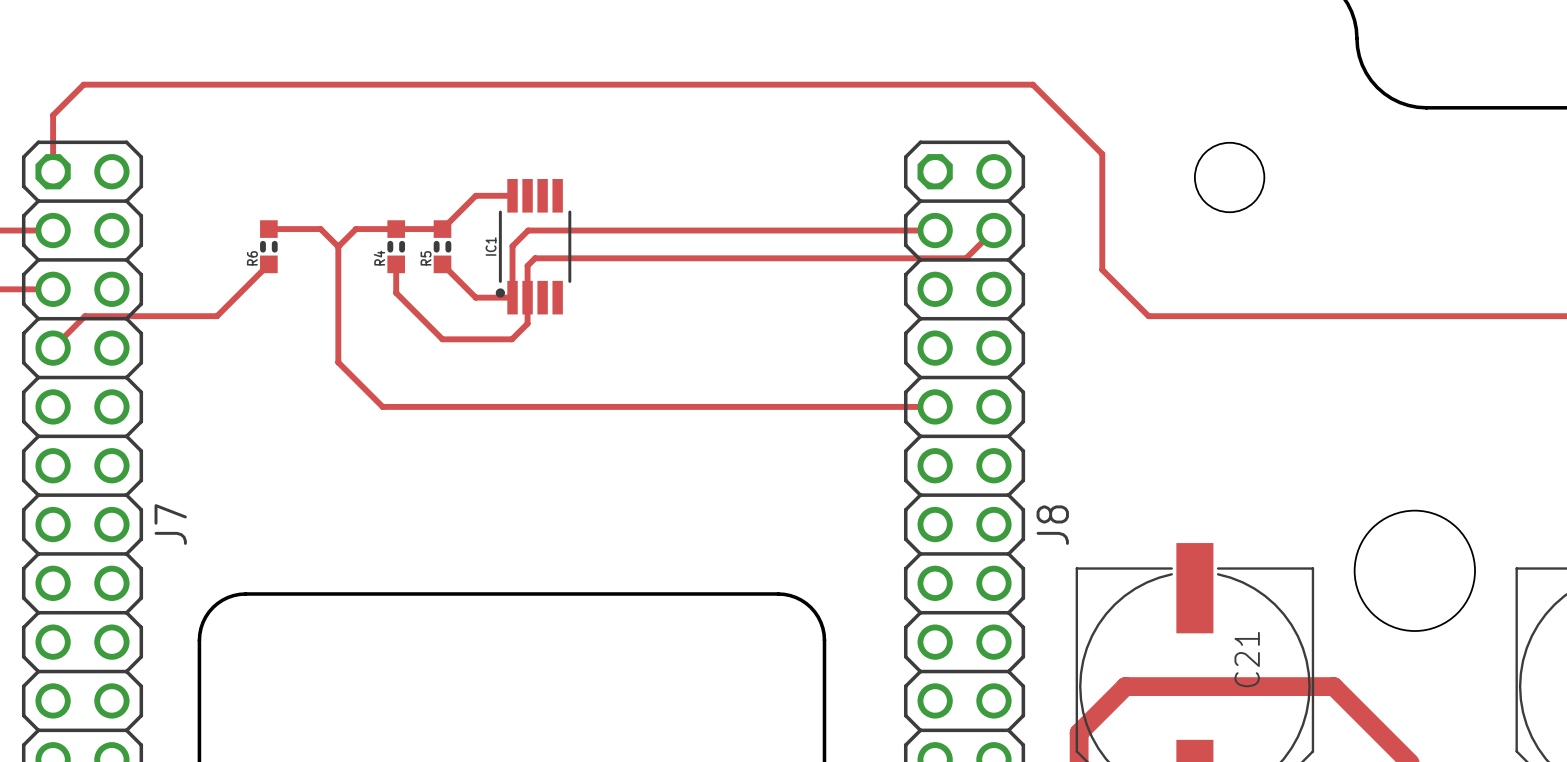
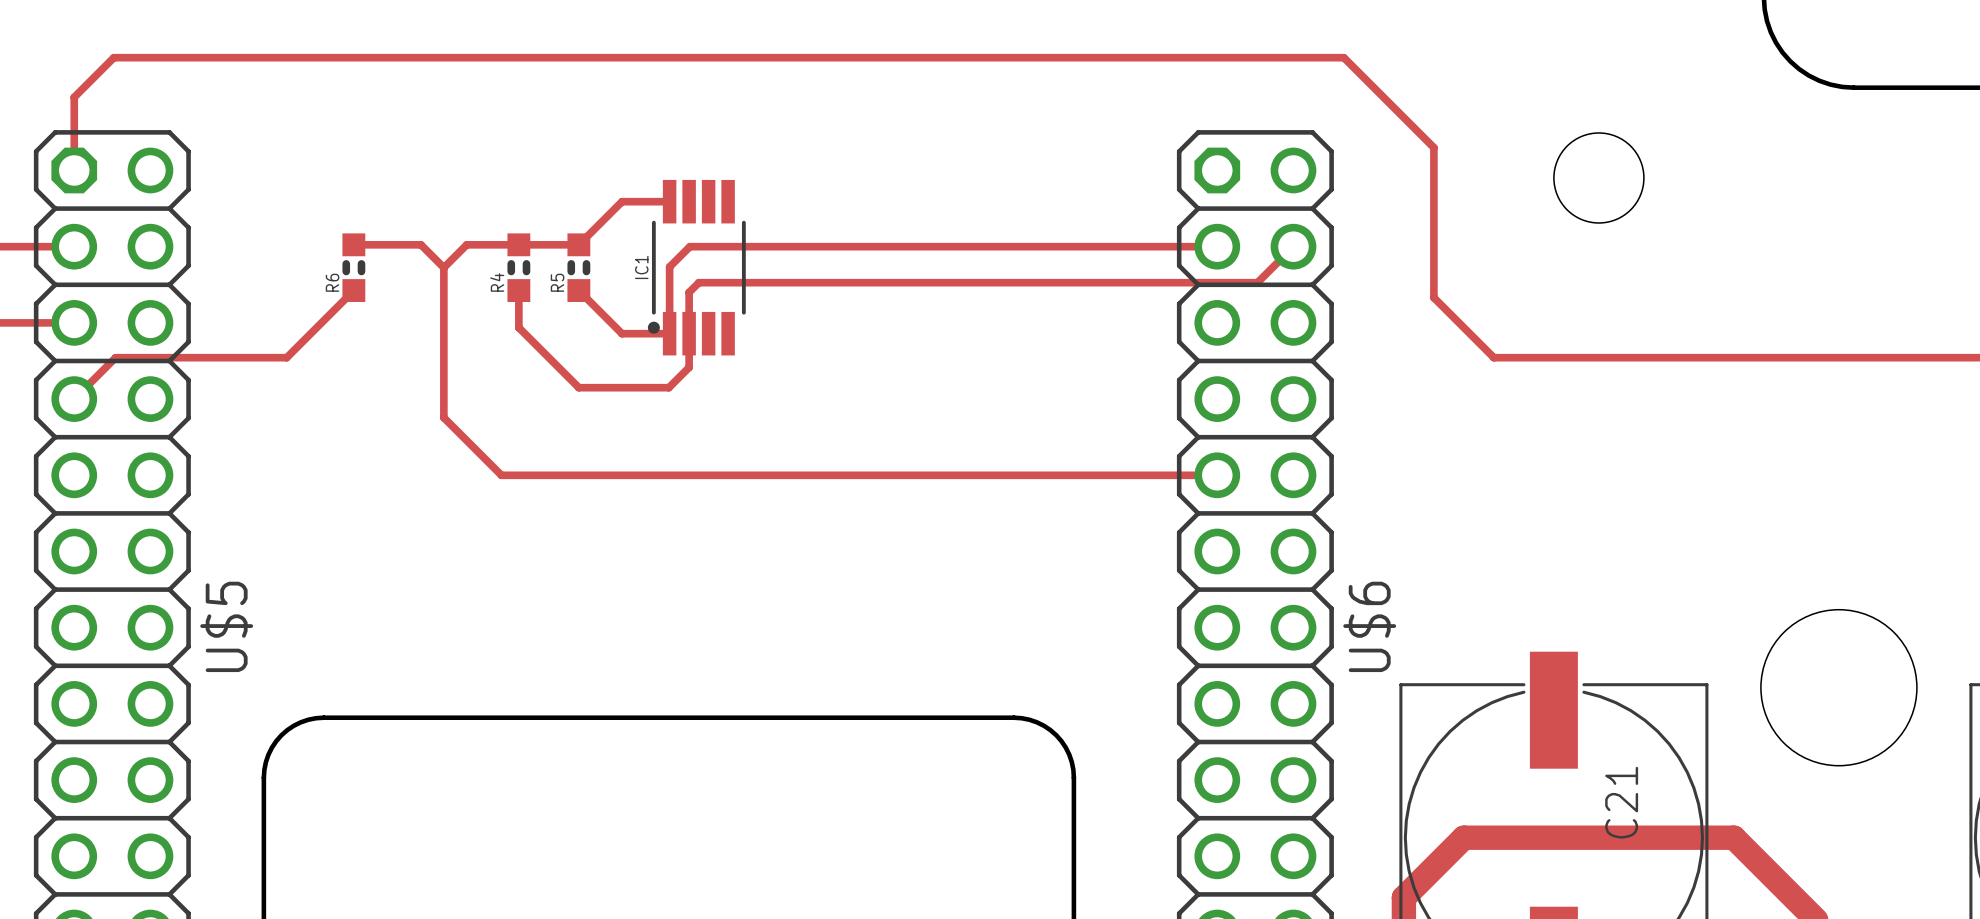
J7 name: J7 (170, 524) -> U$5 (226, 626)
J8 name: J8 (1052, 525) -> U$6 (1369, 626)

